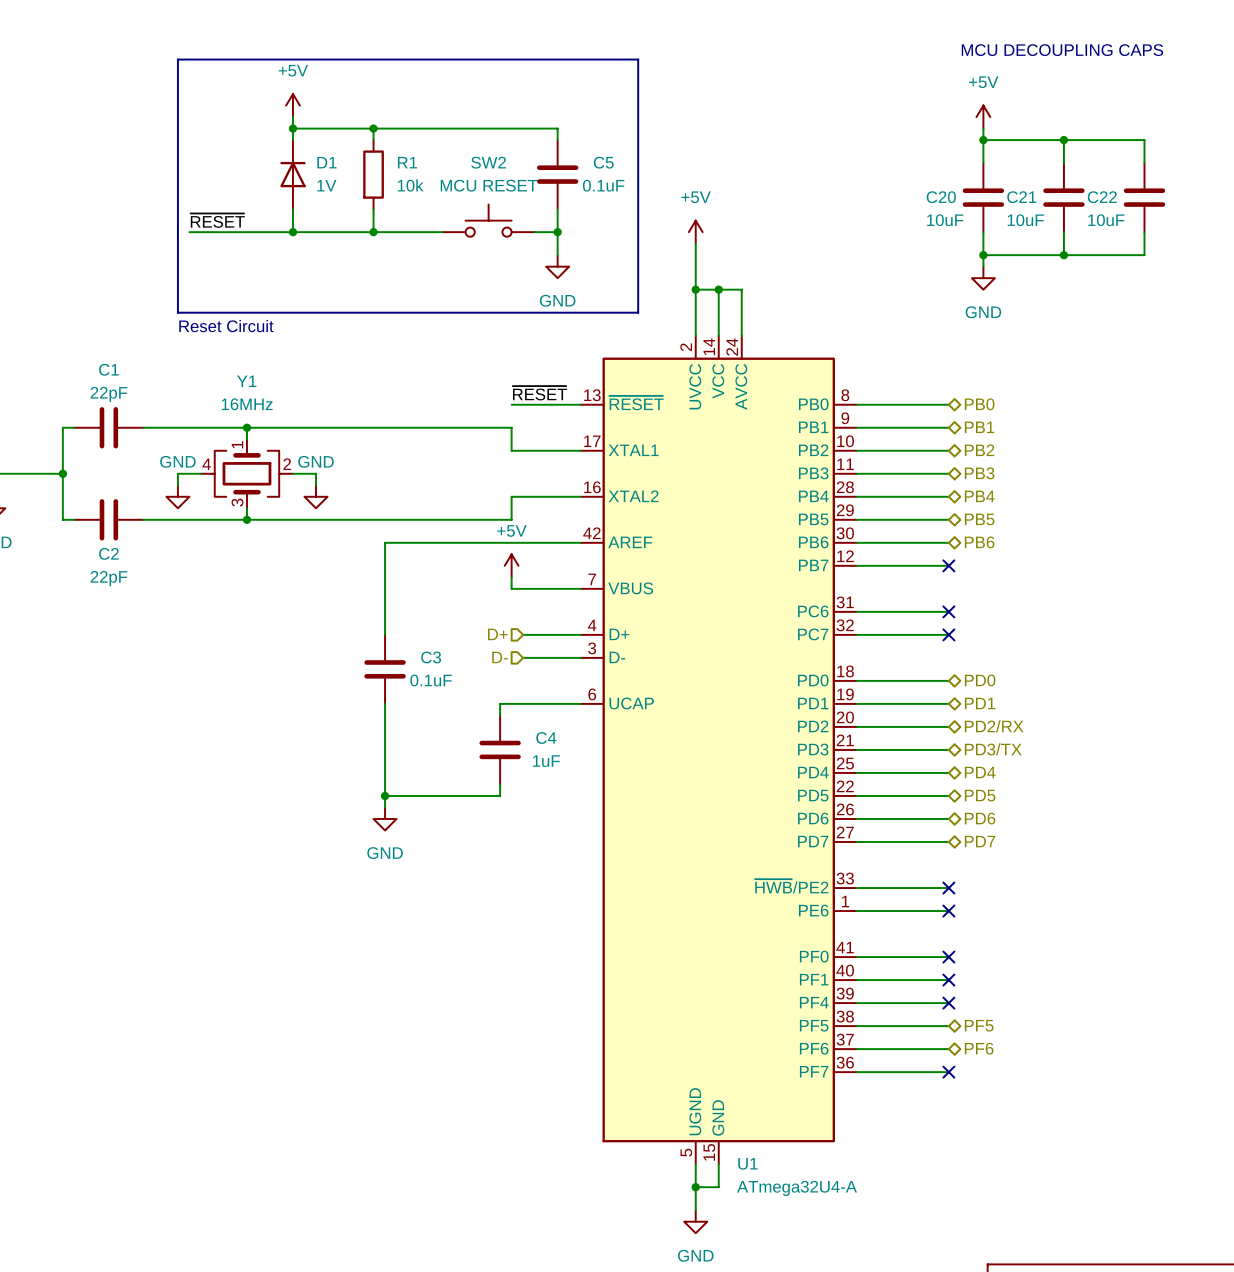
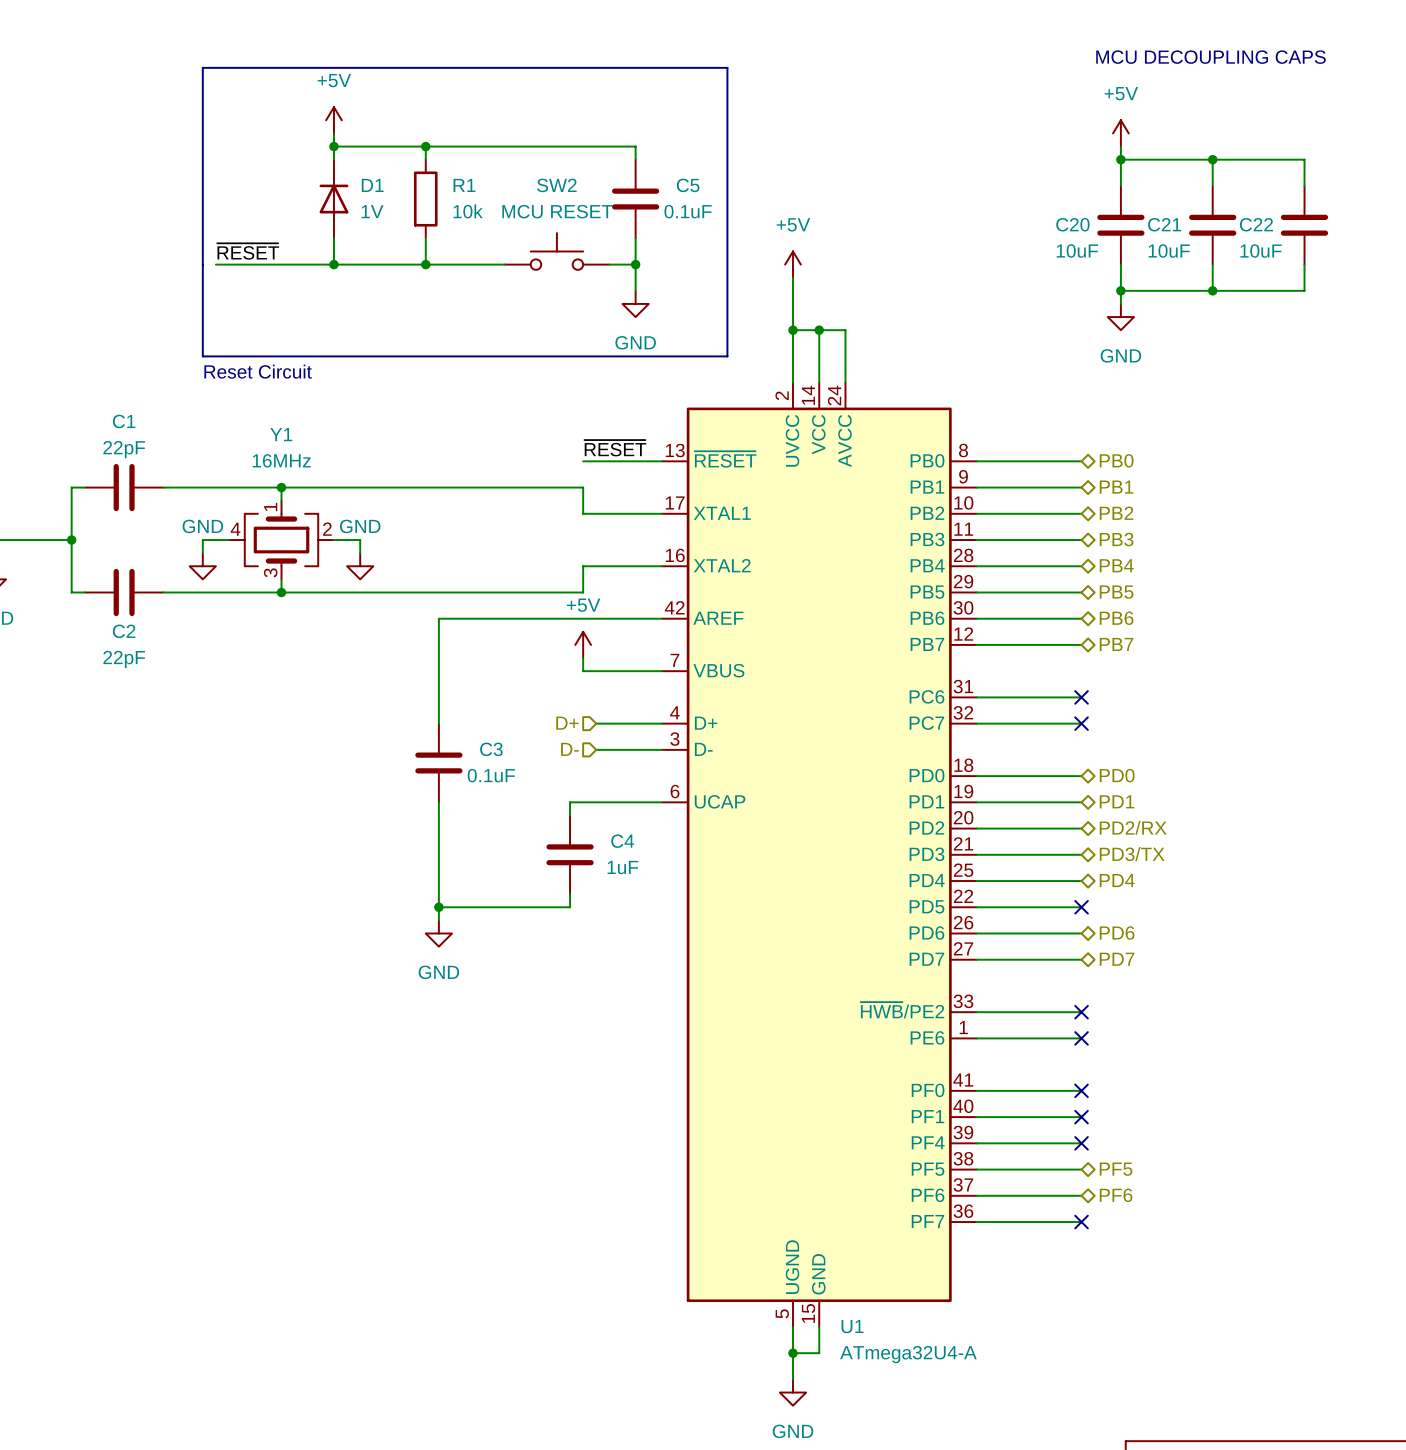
no-connect mark: (948, 565) -> none
hierarchical label: none -> PB7 (1116, 644)
no-connect mark: none -> (1081, 907)
hierarchical label: PD5 (980, 795) -> none

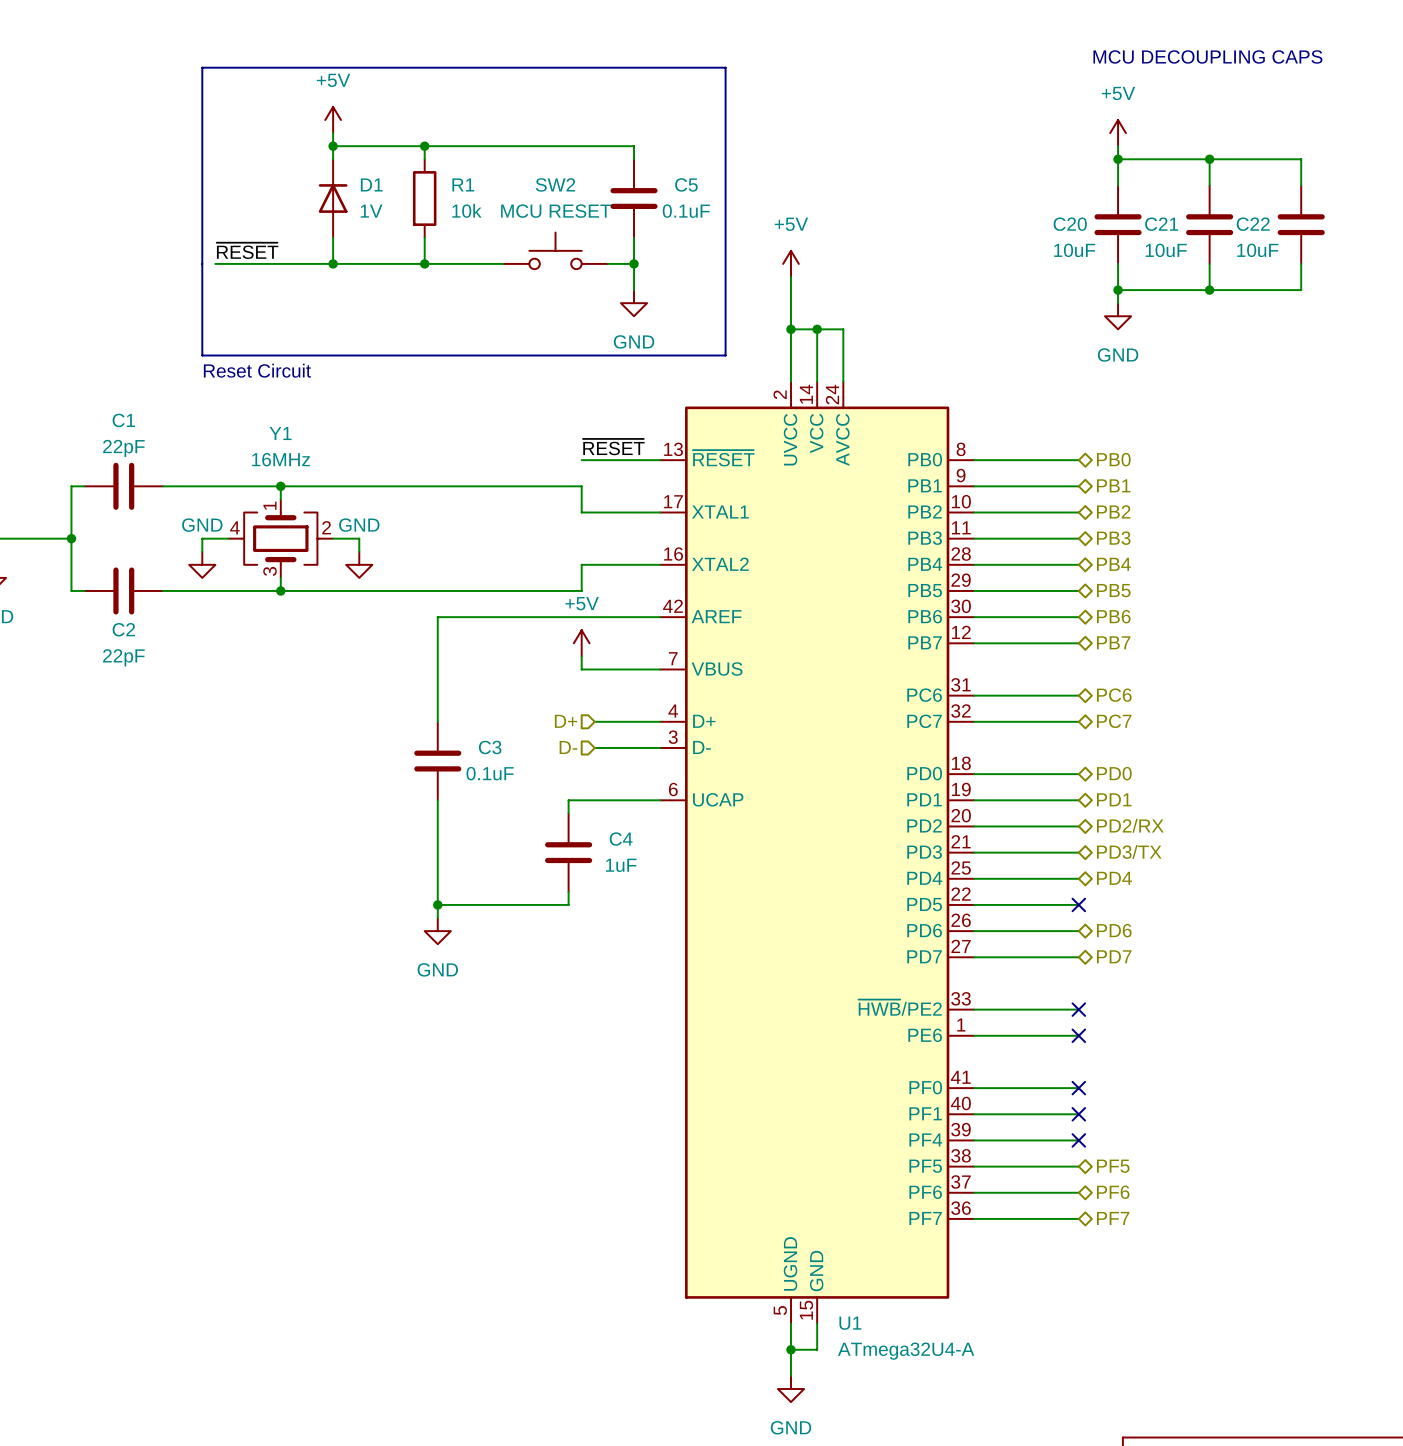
hierarchical label: none -> PC6 (1114, 695)
no-connect mark: (1081, 697) -> none
no-connect mark: (1081, 723) -> none
hierarchical label: none -> PC7 (1114, 721)
hierarchical label: none -> PF7 (1113, 1218)
no-connect mark: (1081, 1222) -> none

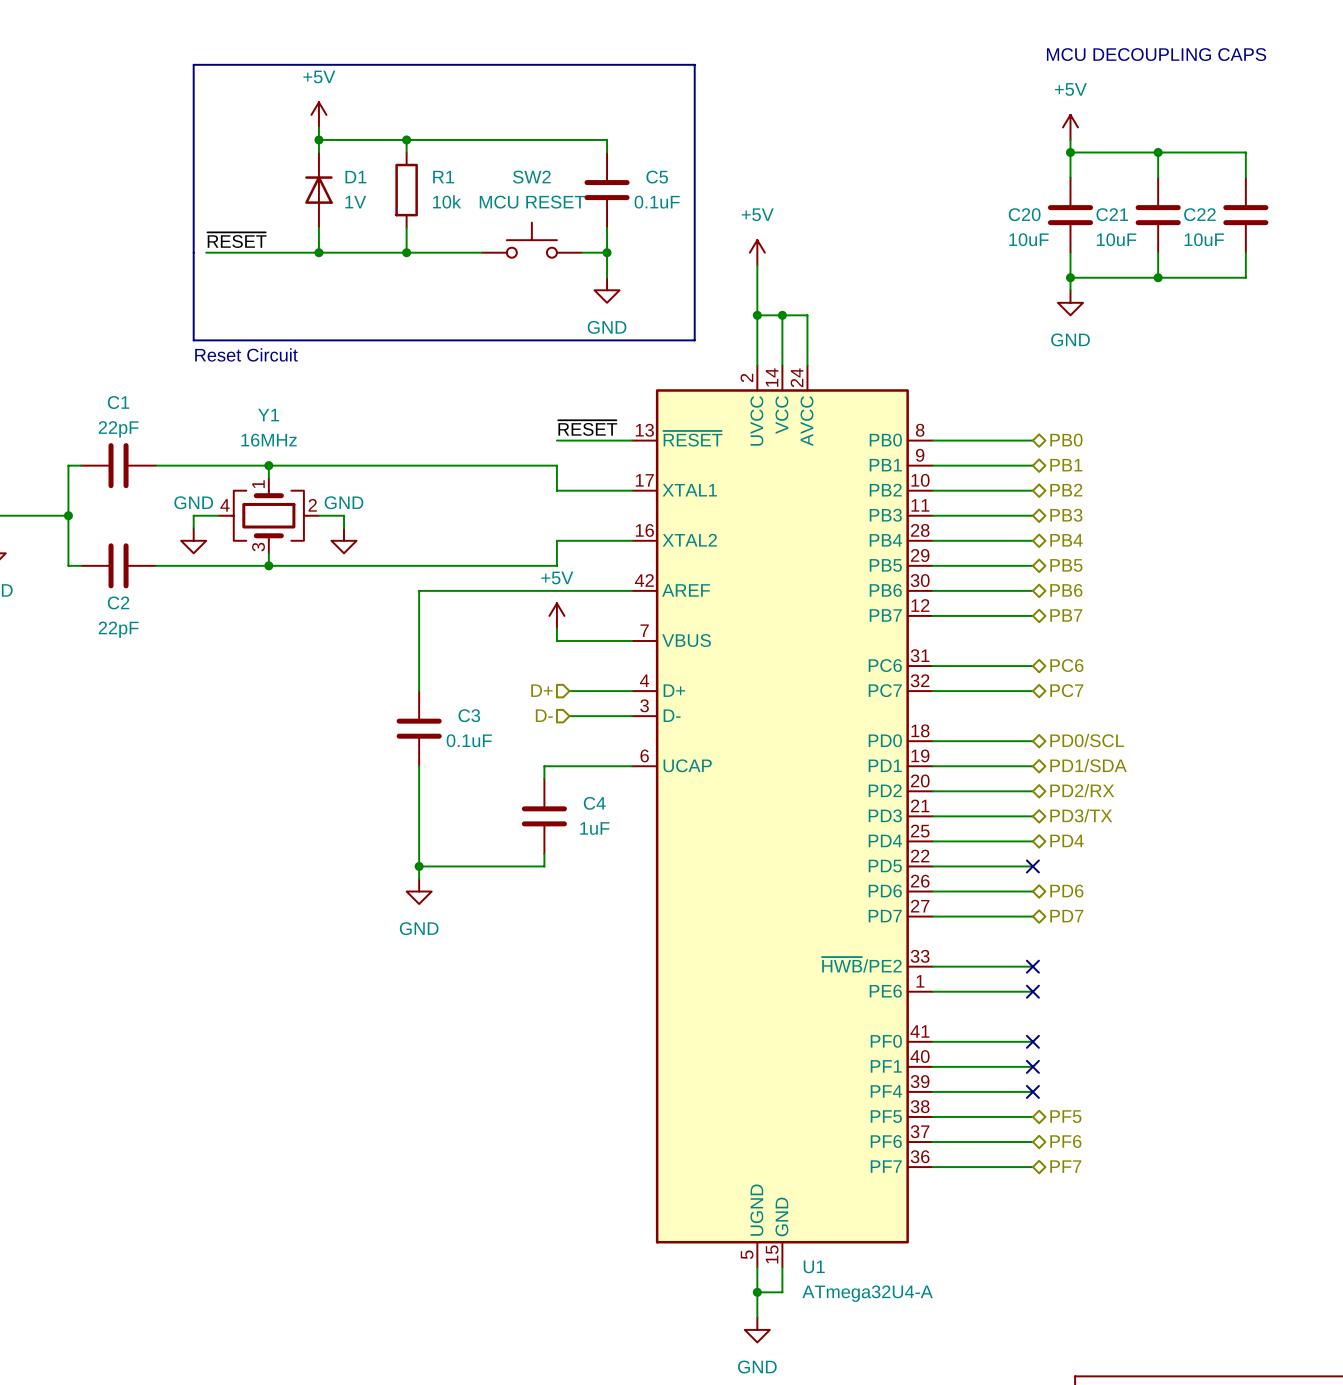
hierarchical label: PD0 (1114, 773) -> PD0/SCL (1087, 740)
hierarchical label: PD1 (1114, 799) -> PD1/SDA (1088, 765)

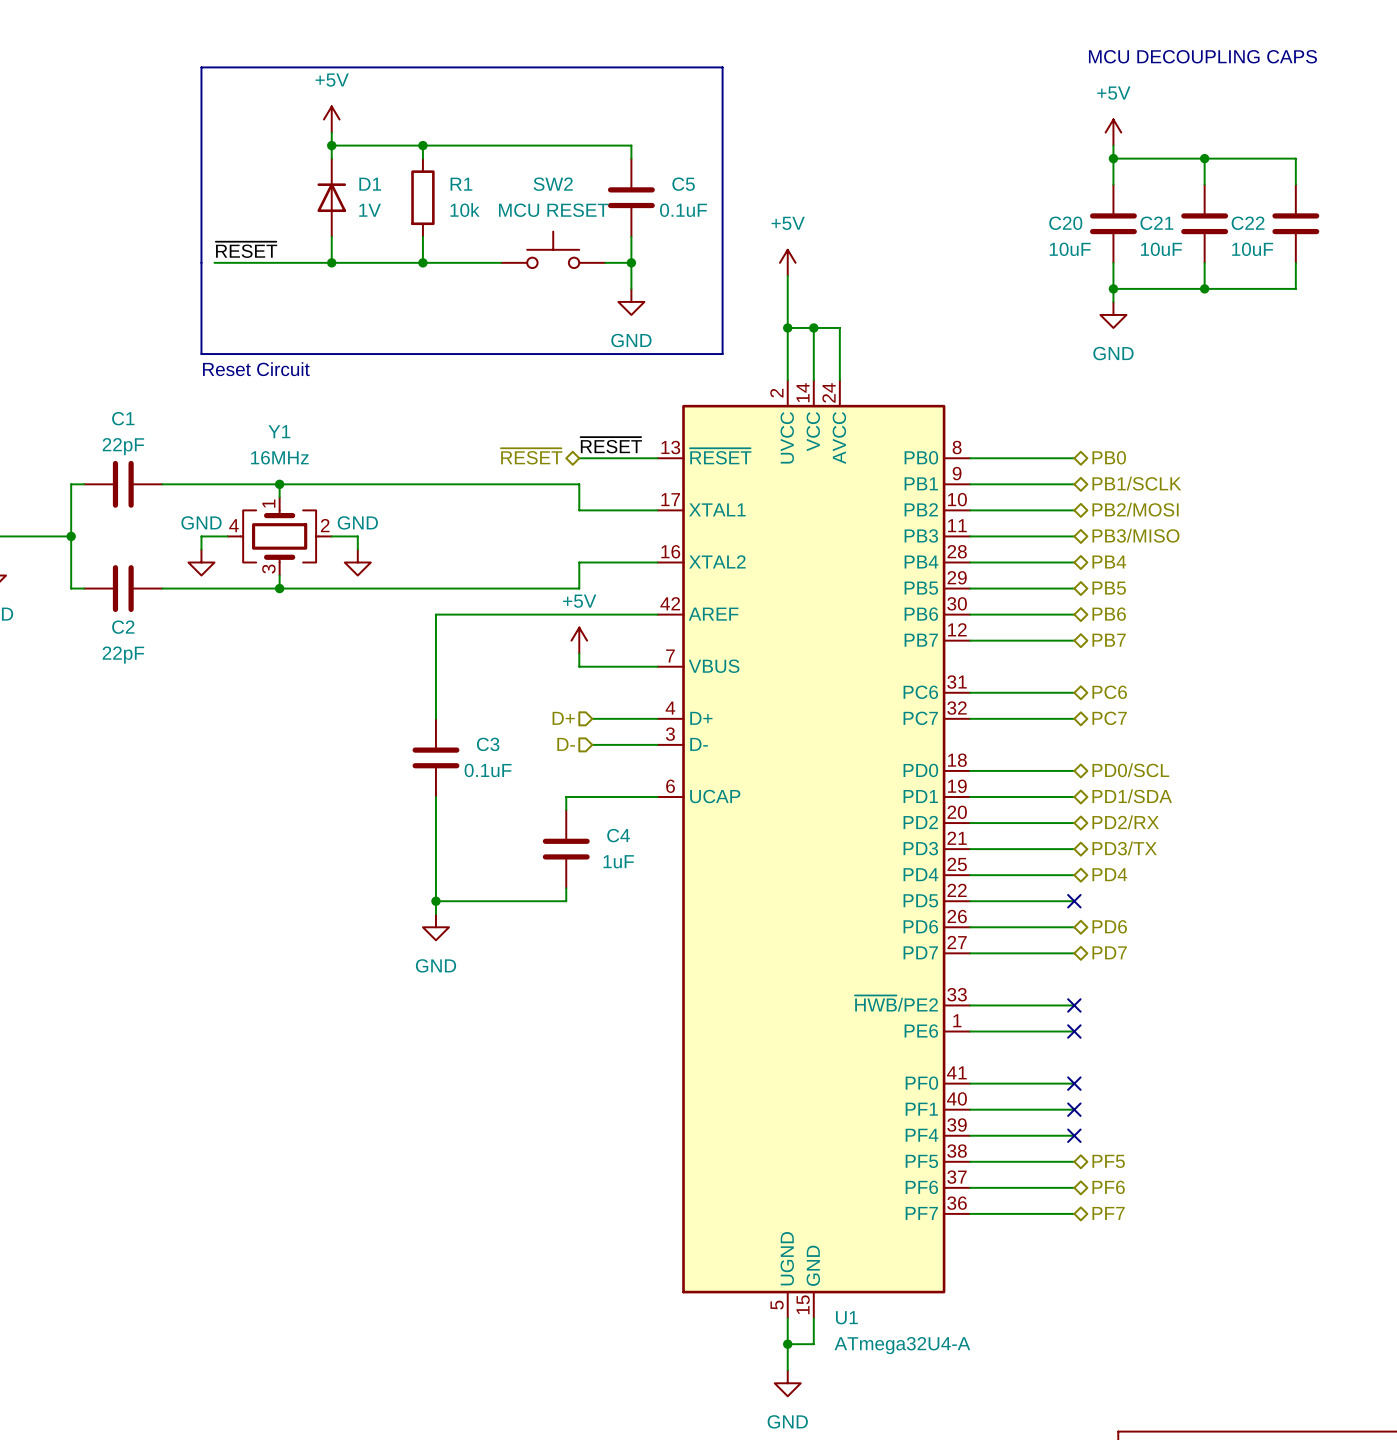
hierarchical label: none -> ~{RESET} (531, 456)
hierarchical label: PB1 (1066, 465) -> PB1/SCLK (1136, 483)
hierarchical label: PB2 (1066, 490) -> PB2/MOSI (1135, 509)
hierarchical label: PB3 (1066, 515) -> PB3/MISO (1135, 535)

